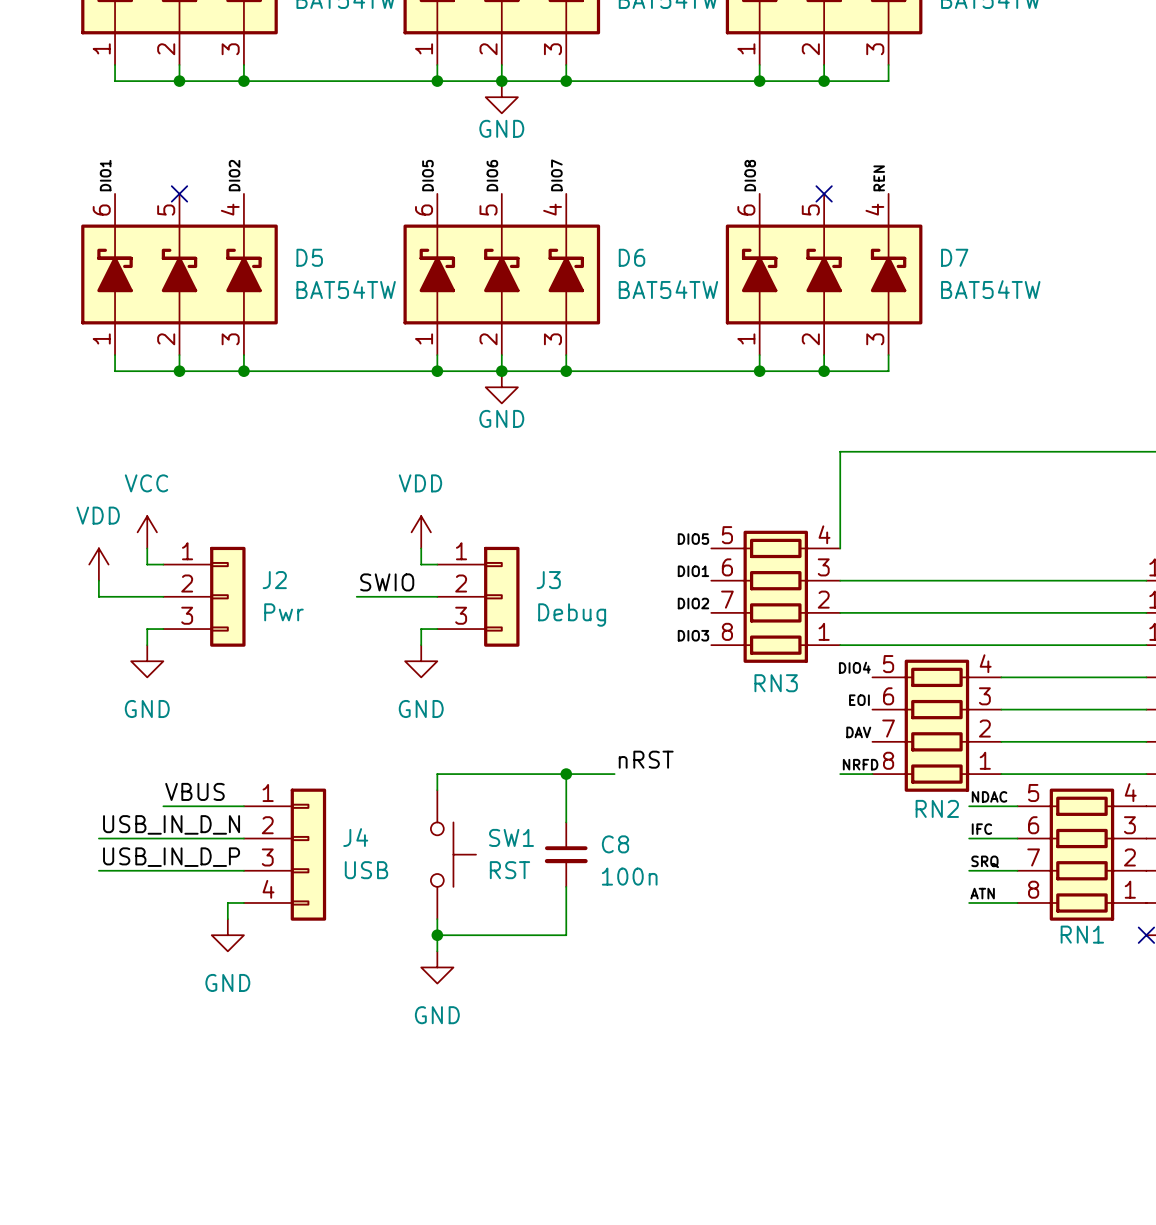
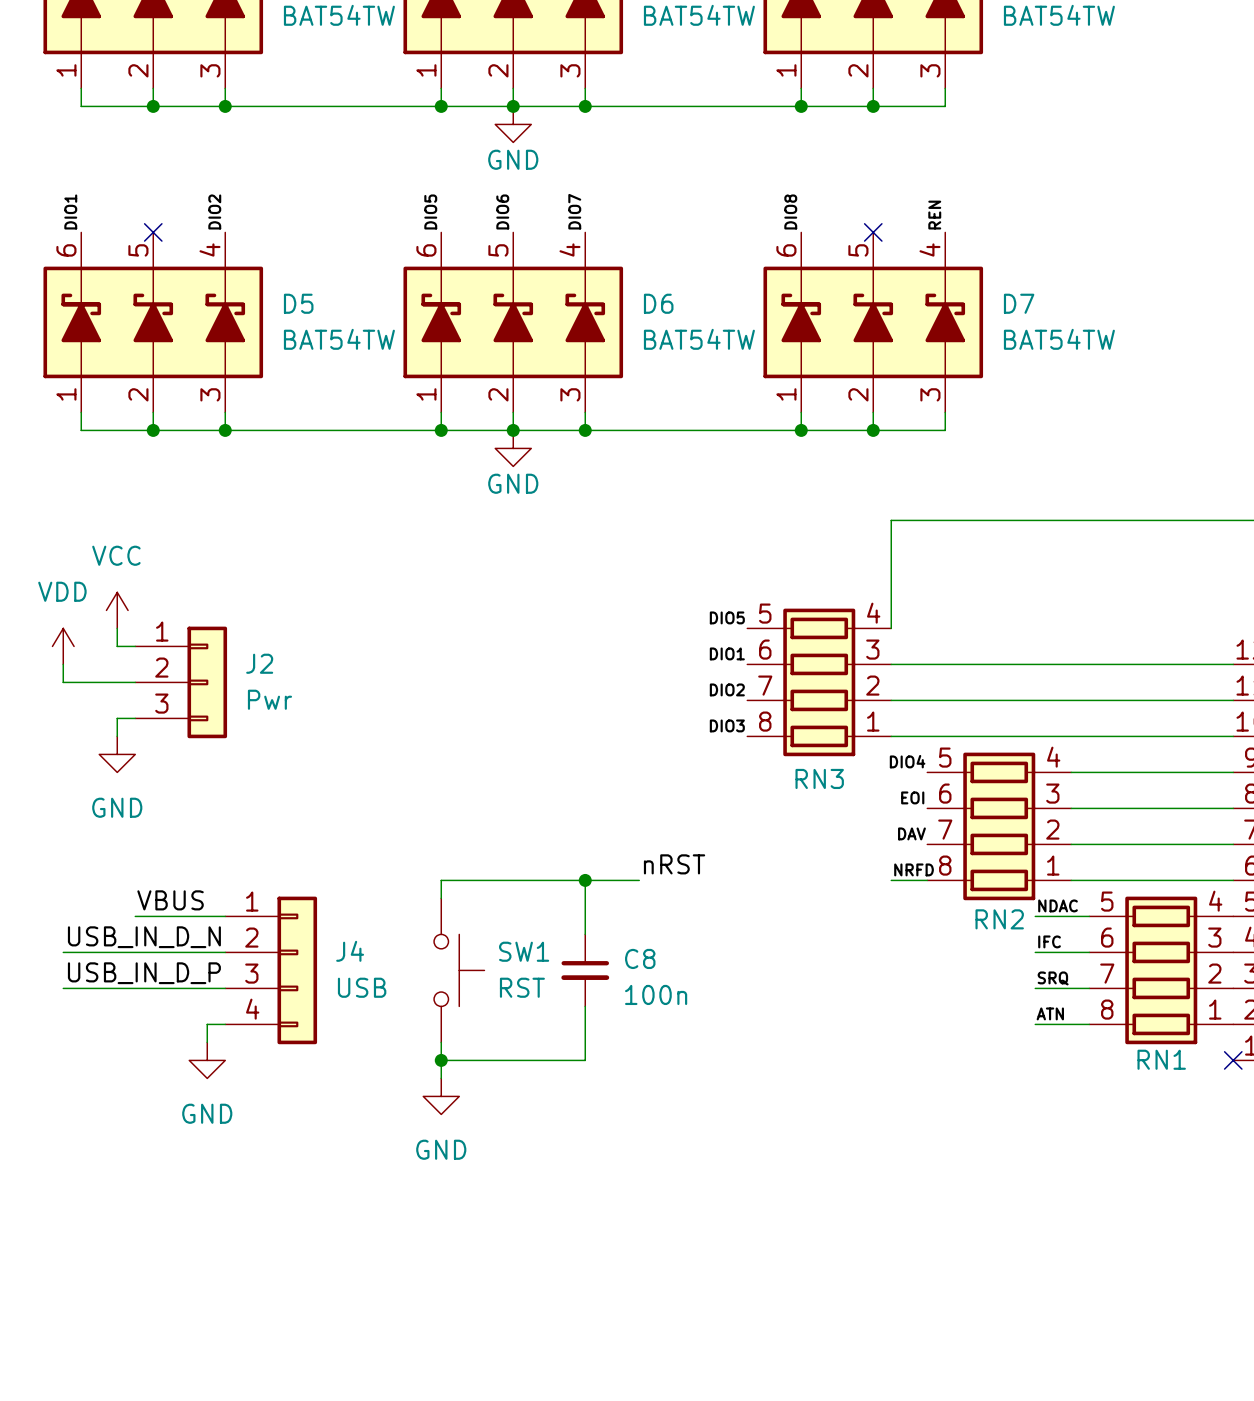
power symbol: VDD (421, 532) -> none
wire: (421, 548) (421, 564) (437, 564) -> none
label: SWIO (387, 582) -> none
wire: (356, 596) (437, 596) -> none
J3: Debug (478, 596) -> none
wire: (437, 629) (421, 629) (421, 645) -> none
power symbol: GND (421, 661) -> none

